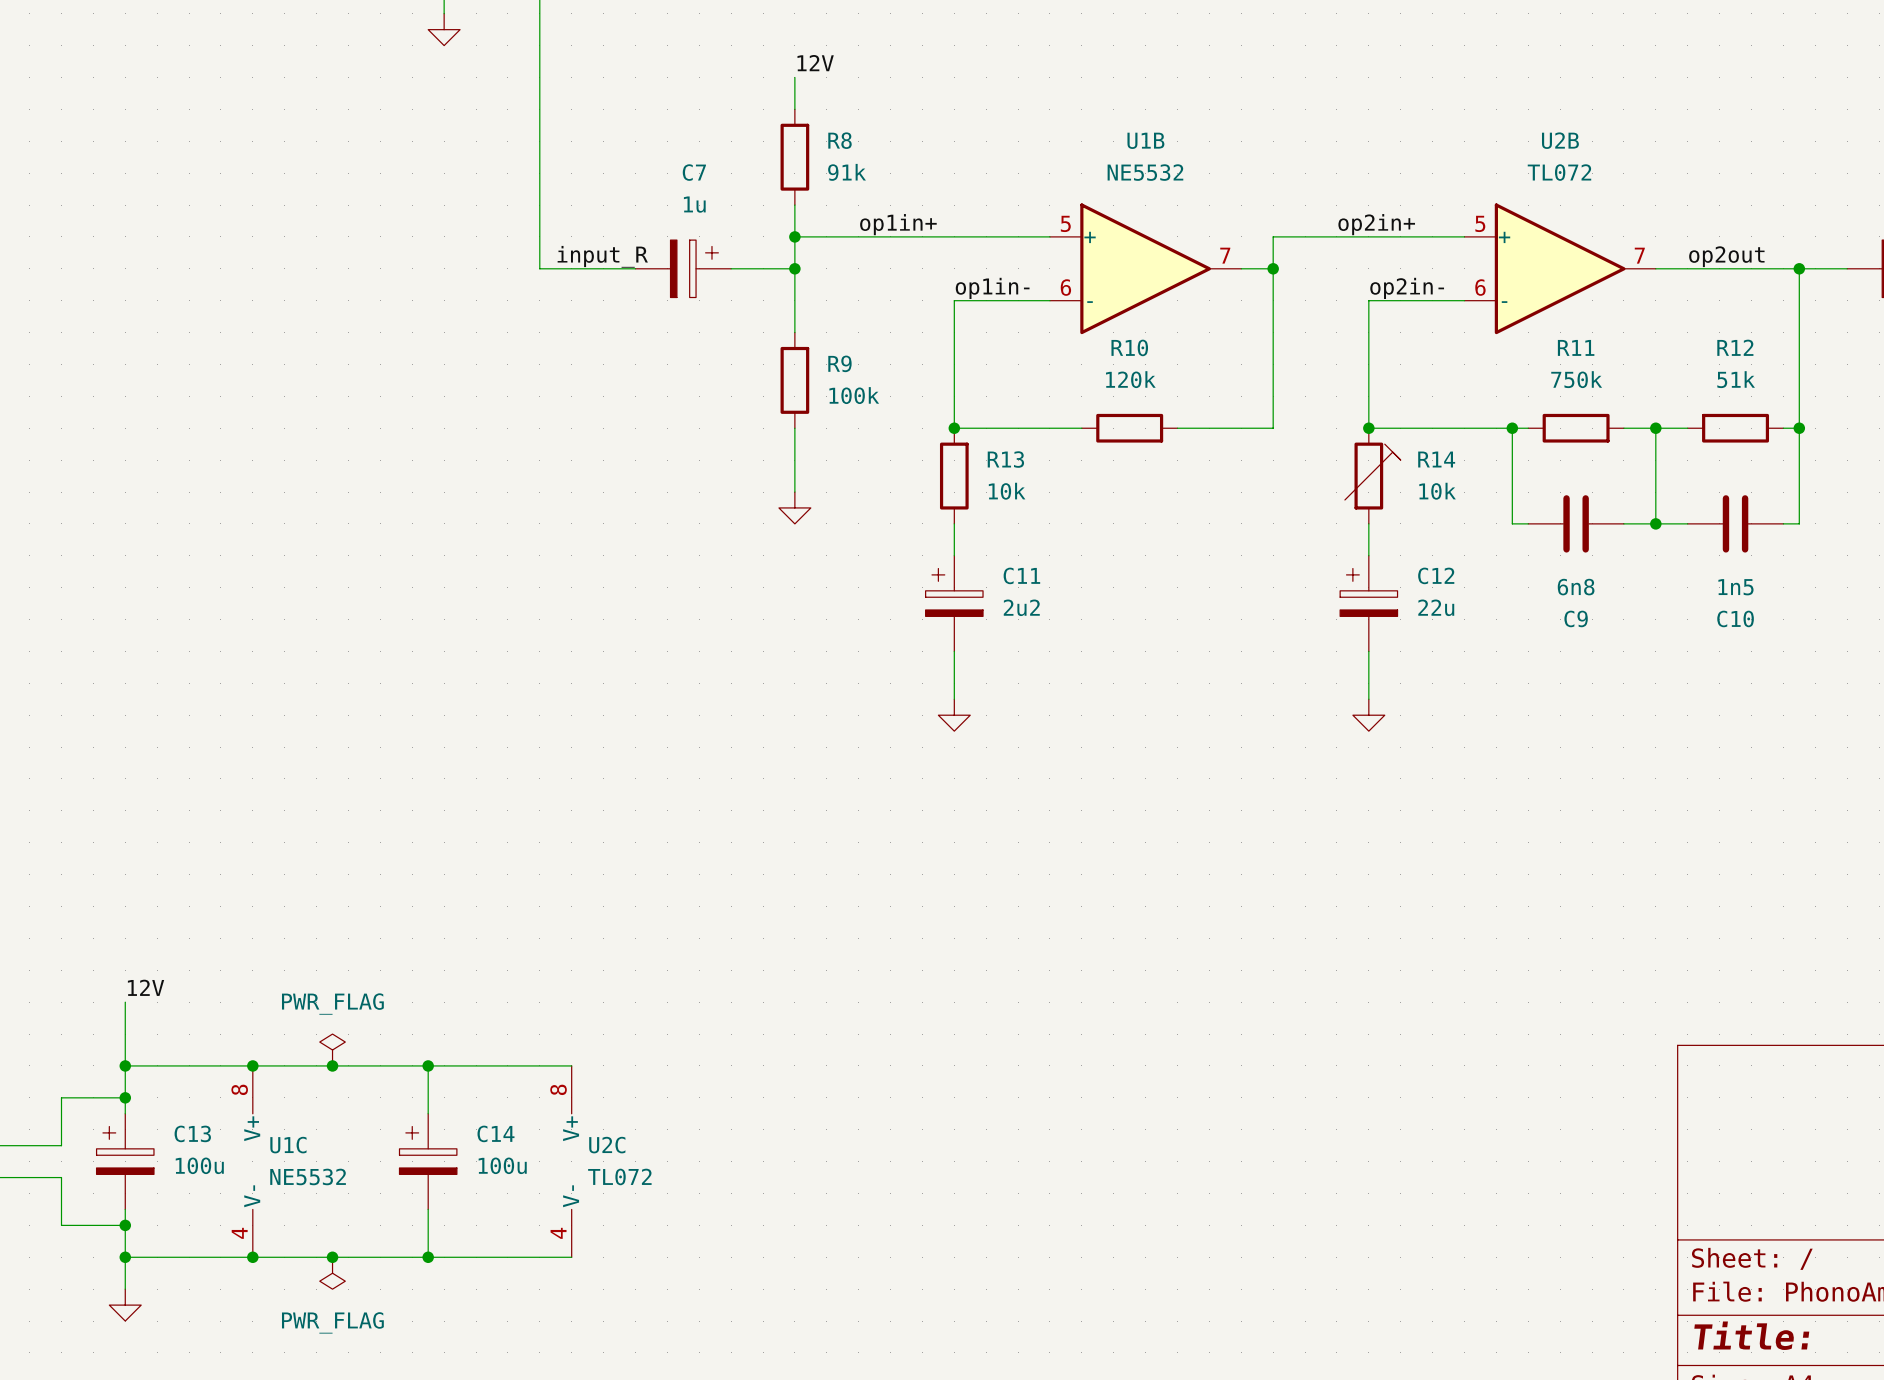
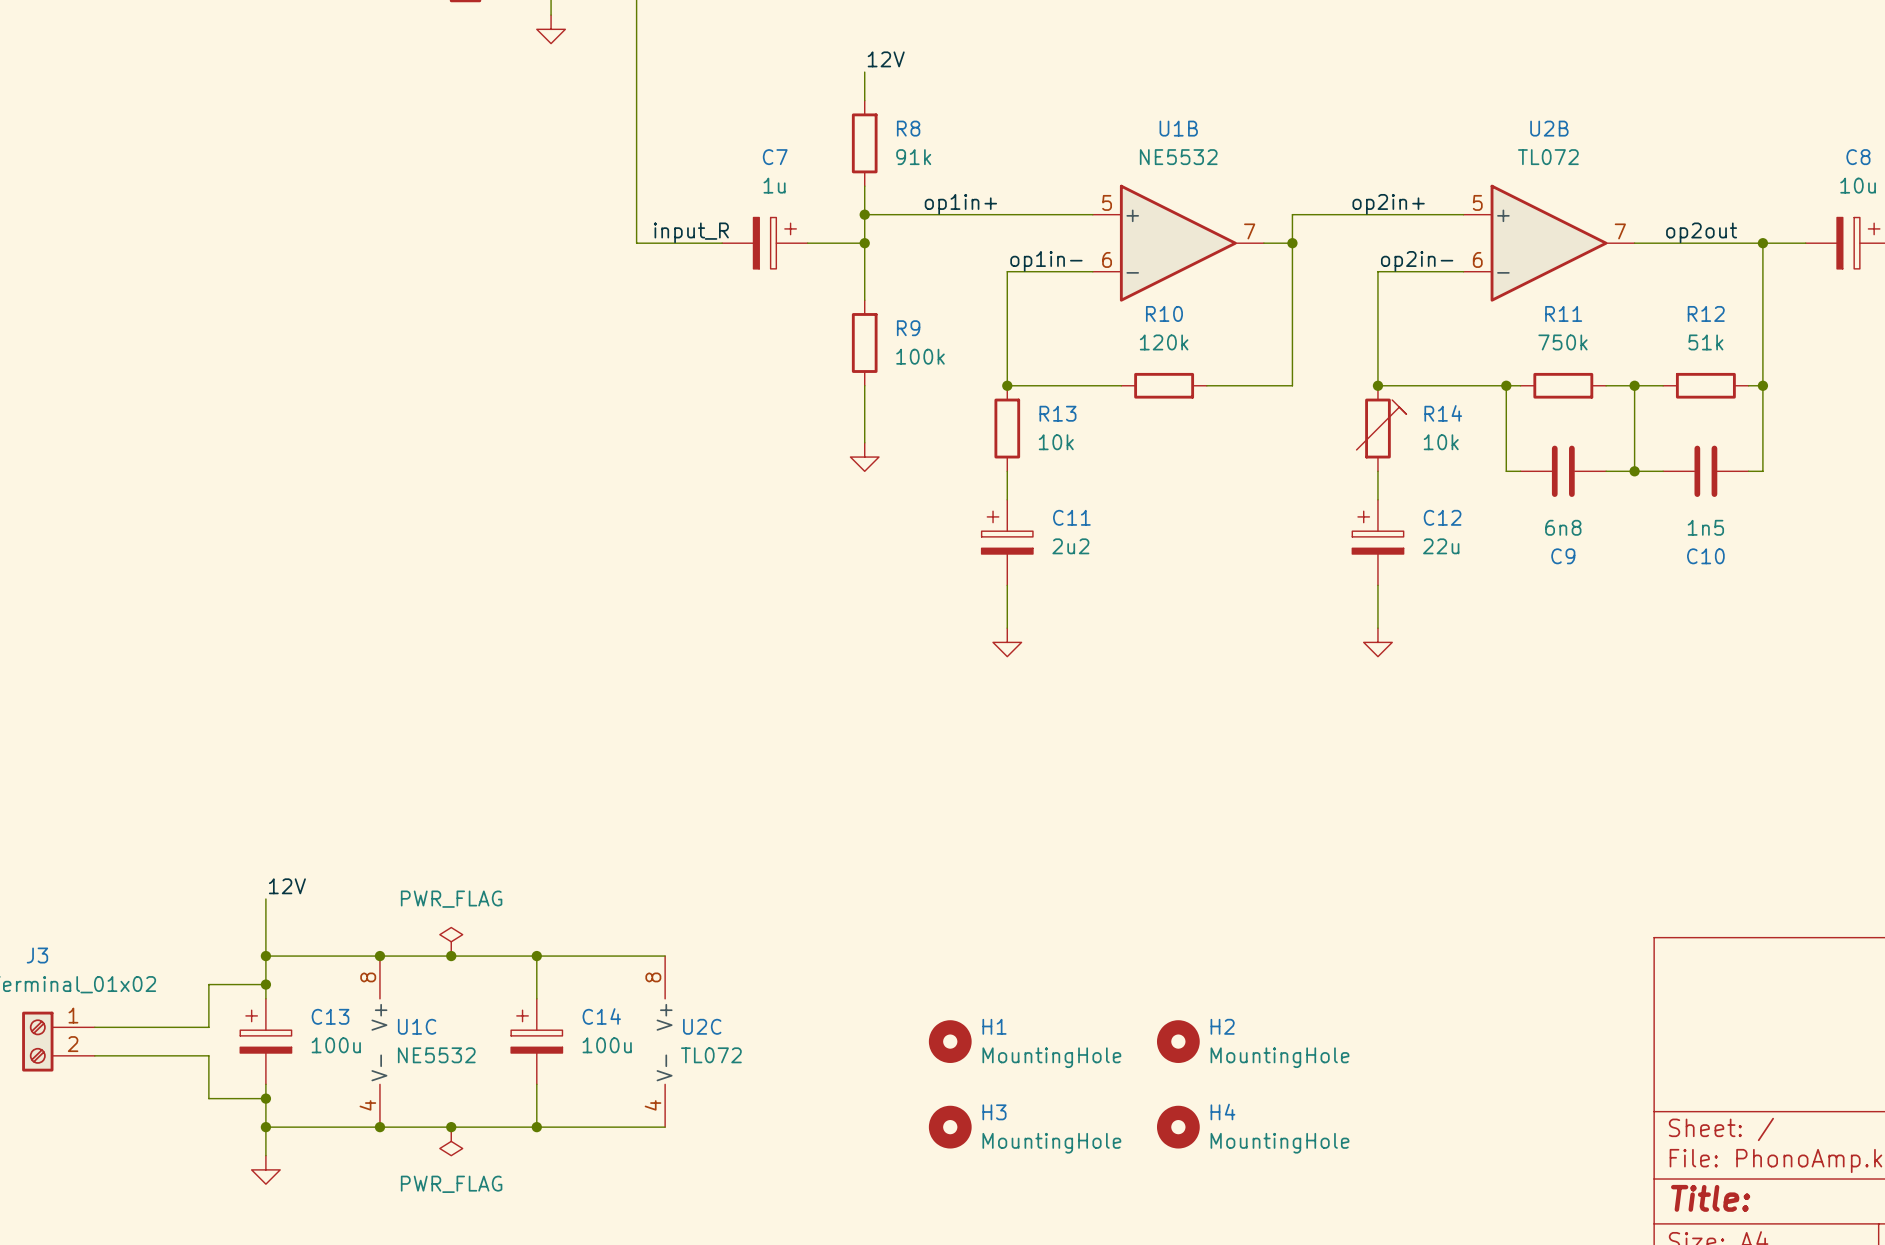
H1: none -> MountingHole (950, 1041)
H2: none -> MountingHole (1178, 1041)
H3: none -> MountingHole (950, 1127)
H4: none -> MountingHole (1178, 1127)

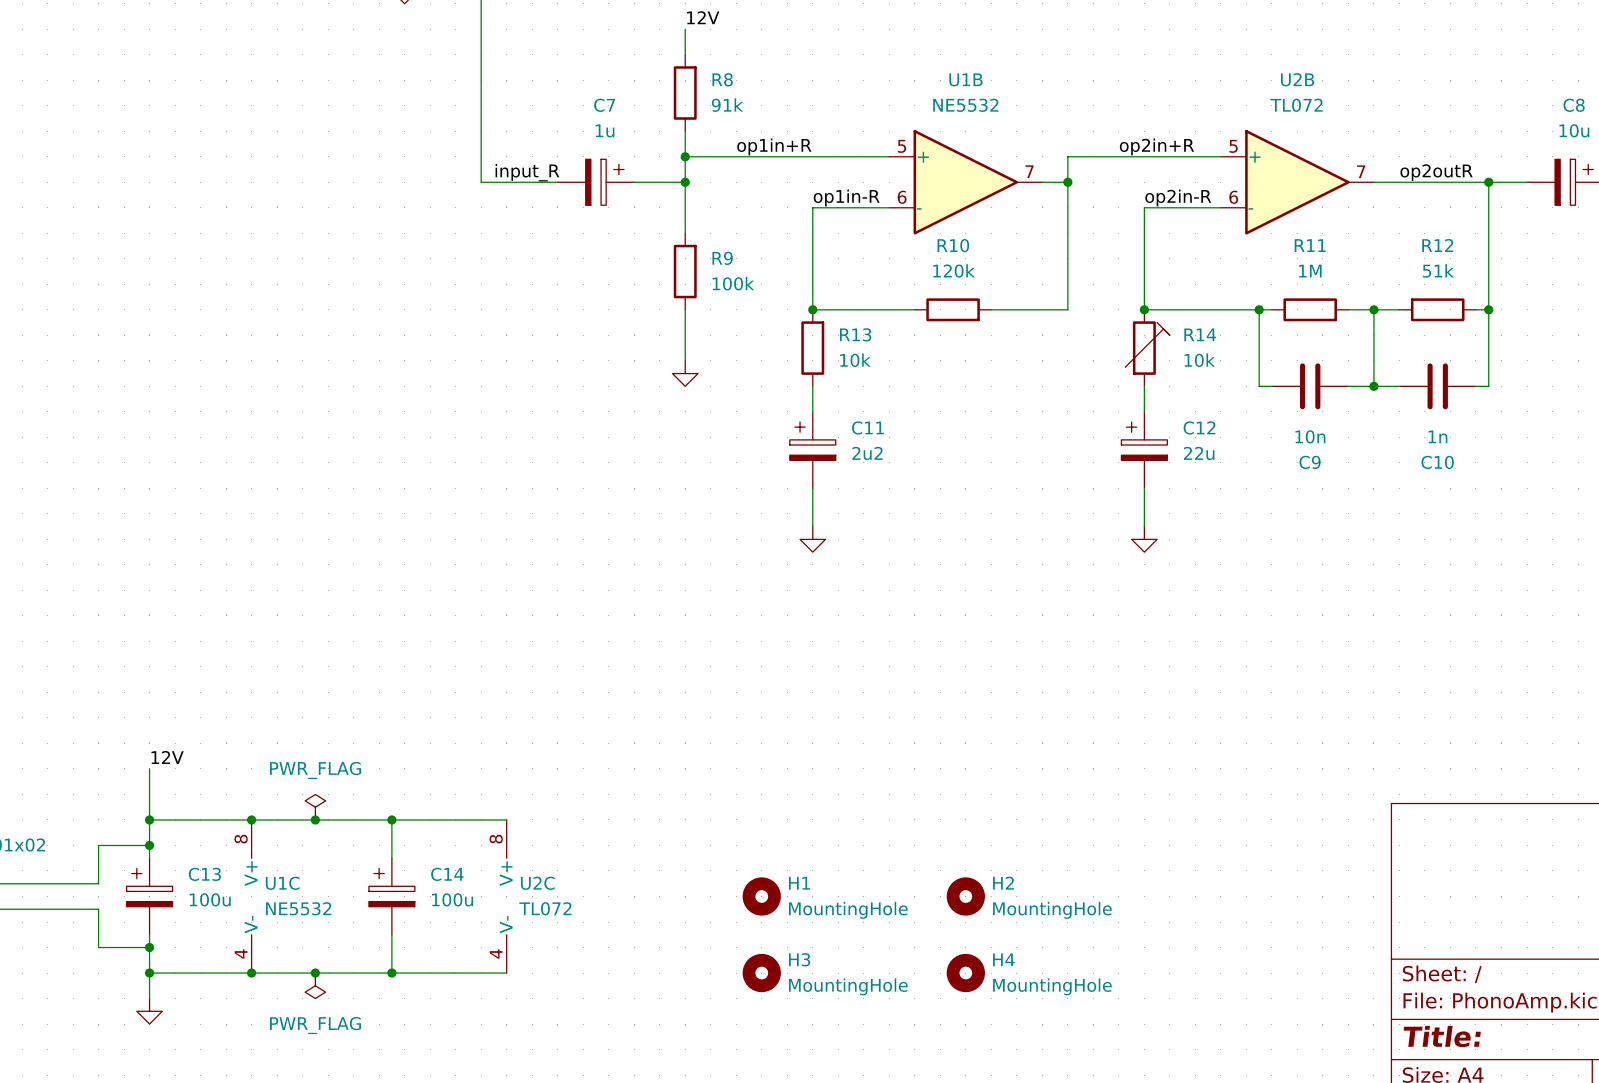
label: op1in+ (960, 204) -> op1in+R (774, 146)
label: op2in+ (1388, 204) -> op2in+R (1156, 146)
label: op2out (1701, 232) -> op2outR (1436, 172)
label: op1in- (1046, 261) -> op1in-R (846, 197)
label: op2in- (1417, 261) -> op2in-R (1178, 197)
R11 value: 750k (1562, 342) -> 1M (1310, 271)
C9 value: 6n8 (1563, 527) -> 10n (1310, 436)
C10 value: 1n5 (1705, 527) -> 1n (1437, 436)

